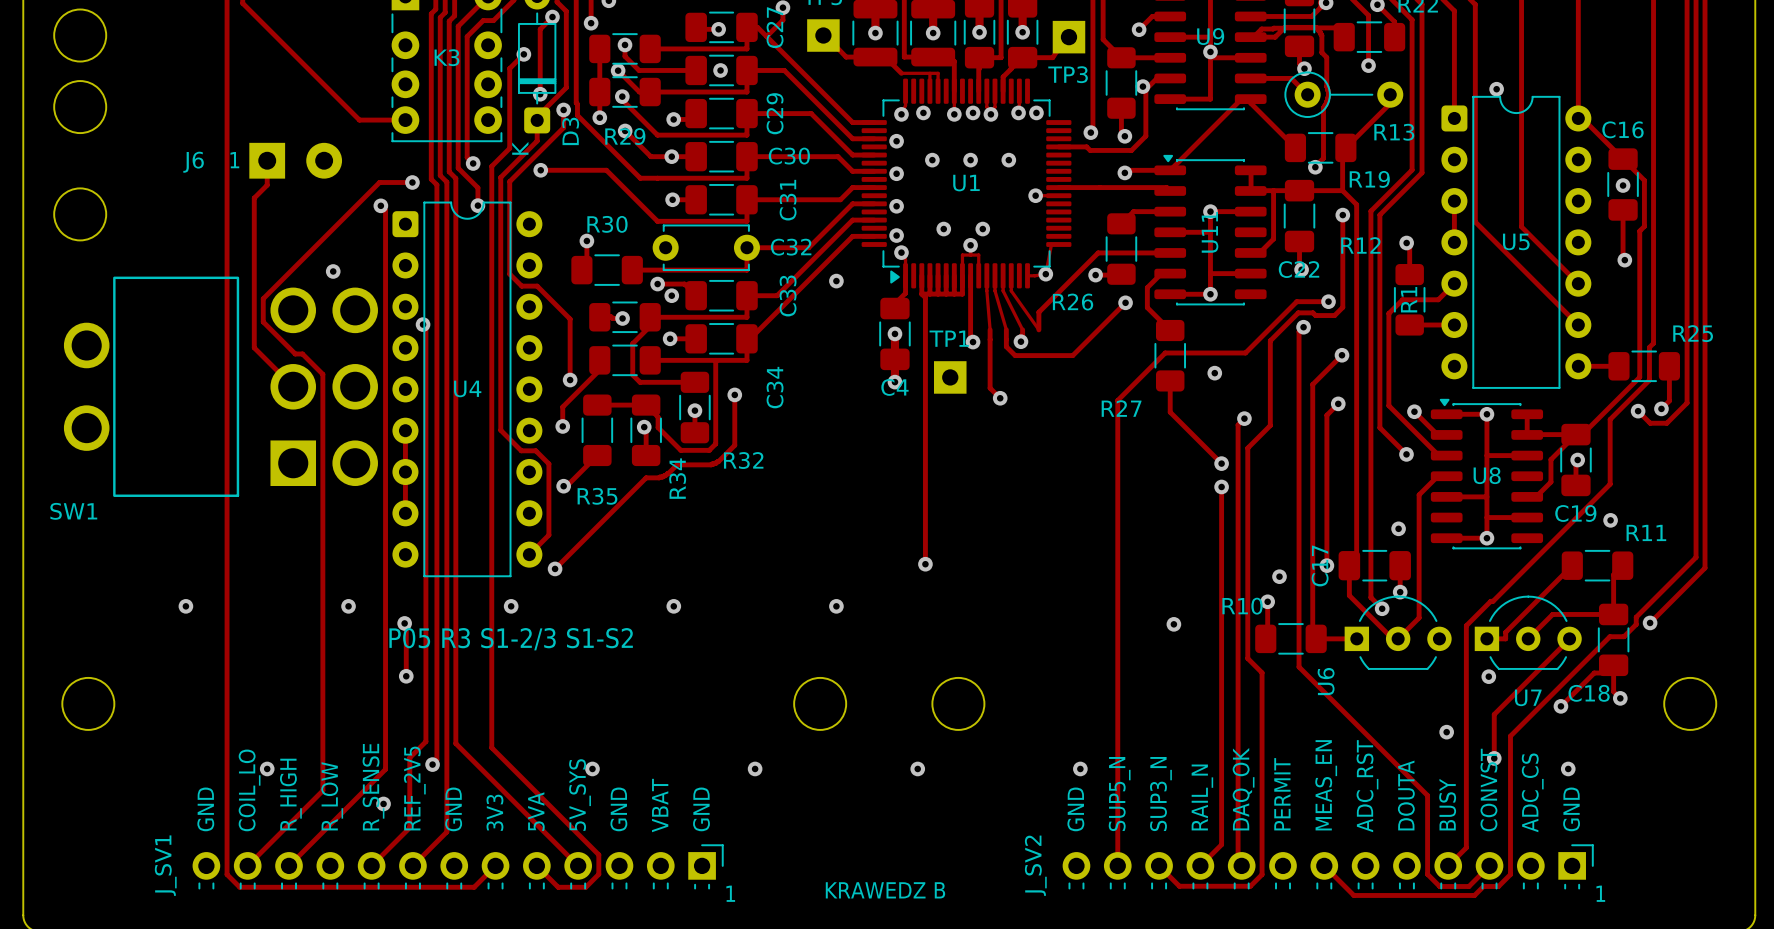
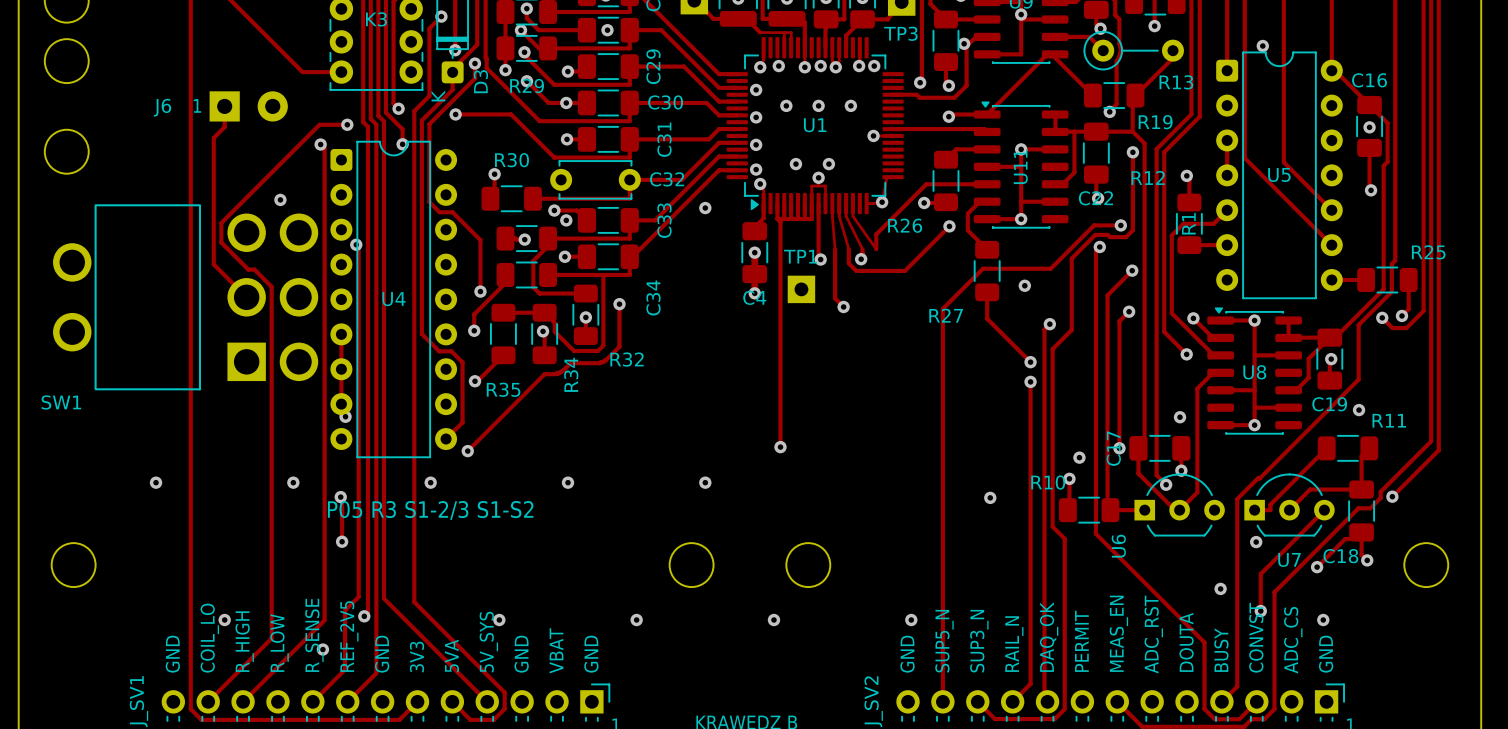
via: none -> (345, 416)

